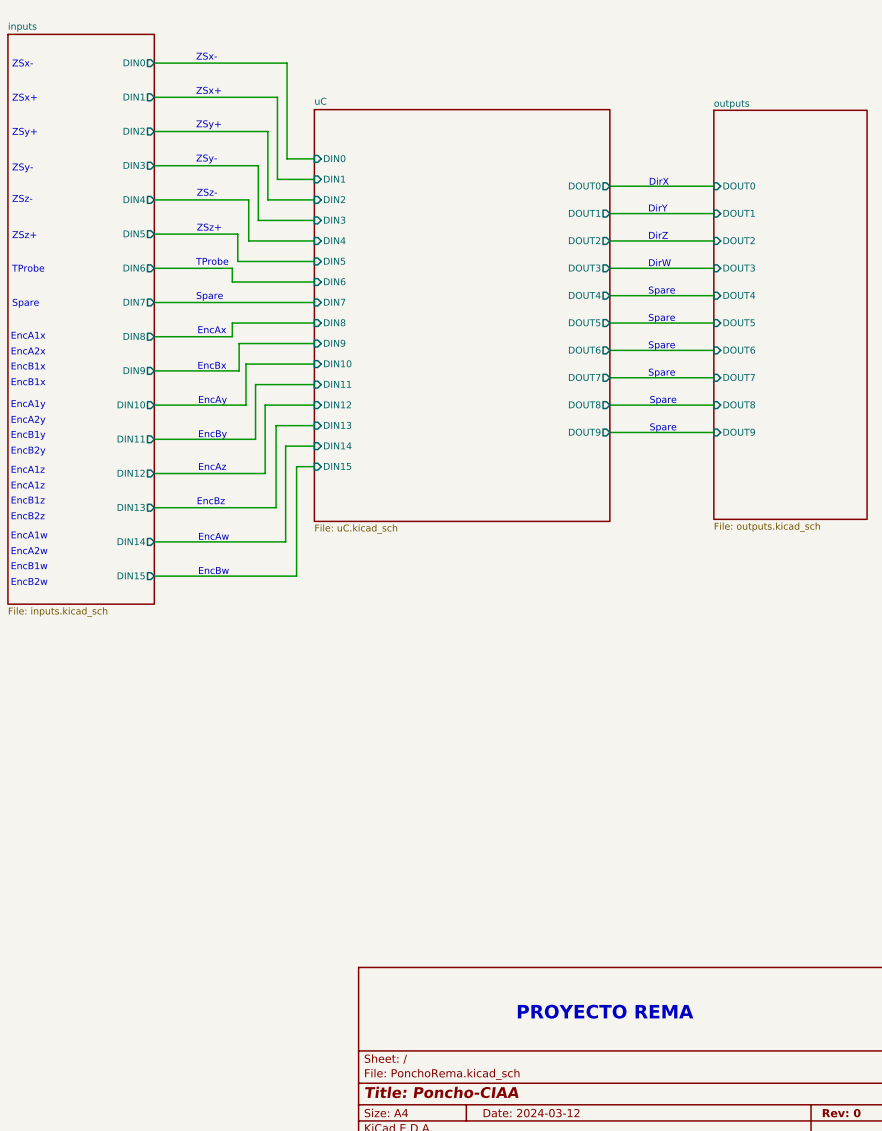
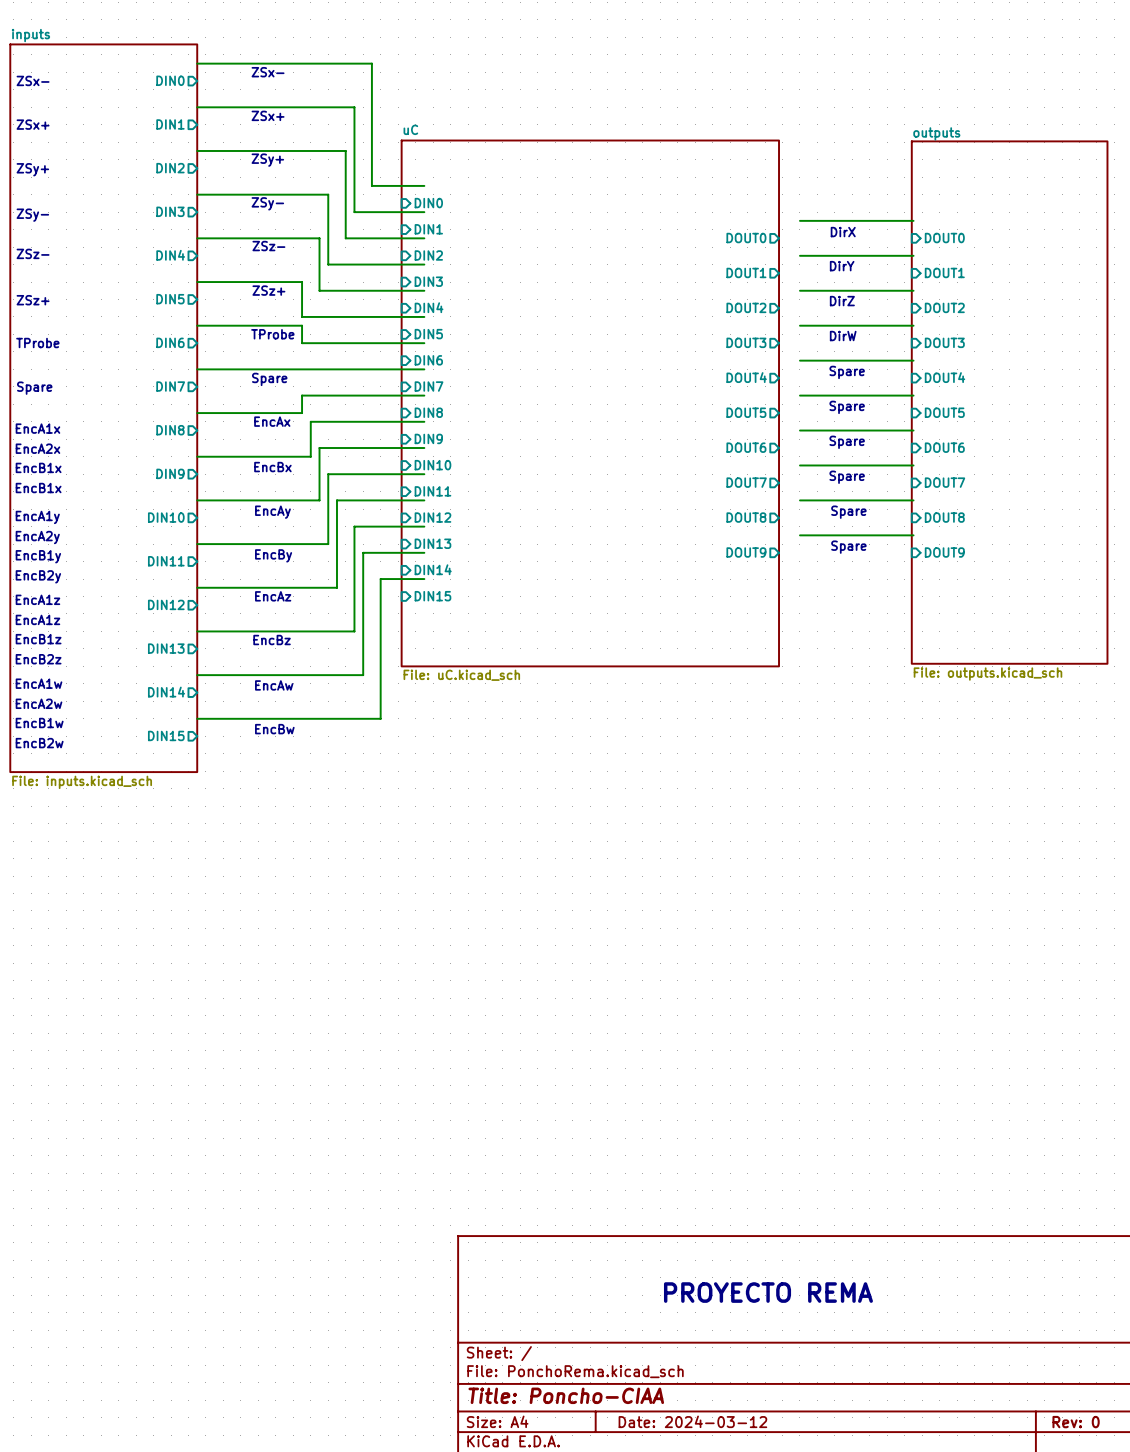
wire: none -> (197, 63) (371, 63) (371, 185) (424, 185)
wire: (154, 63) (287, 63) (287, 158) (314, 158) -> none
wire: (154, 97) (277, 97) -> (197, 107) (354, 107) (354, 124)
wire: none -> (197, 150) (345, 150) (345, 238) (424, 238)
wire: (154, 131) (267, 131) (267, 199) (314, 199) -> none
wire: none -> (197, 194) (328, 194) (328, 264) (424, 264)
wire: (154, 165) (258, 165) (258, 220) (314, 220) -> none
wire: (277, 165) (277, 179) (314, 179) -> (354, 212) (424, 212)
wire: none -> (799, 220) (913, 220)
wire: none -> (197, 238) (319, 238) (319, 290) (424, 290)
wire: (609, 186) (713, 186) -> none
wire: (154, 199) (248, 199) (248, 240) (314, 240) -> none
wire: none -> (799, 255) (913, 255)
wire: (609, 213) (713, 213) -> none
wire: none -> (197, 282) (302, 282) (302, 316) (424, 316)
wire: none -> (799, 290) (913, 290)
wire: (154, 234) (237, 234) (237, 261) (314, 261) -> none
wire: (609, 240) (713, 240) -> none
wire: none -> (197, 325) (302, 325) (302, 343) (424, 343)
wire: none -> (799, 325) (913, 325)
wire: (154, 268) (232, 268) (232, 281) (314, 281) -> none
wire: (609, 268) (713, 268) -> none
wire: none -> (799, 360) (913, 360)
wire: none -> (197, 369) (424, 369)
wire: (609, 295) (713, 295) -> none
wire: (154, 302) (314, 302) -> none
wire: none -> (799, 395) (913, 395)
wire: (232, 323) (232, 336) (154, 336) -> (296, 413) (197, 413)
wire: (236, 323) (314, 323) -> (302, 413) (302, 395) (424, 395)
wire: (609, 323) (713, 323) -> none
wire: none -> (424, 421) (310, 421) (310, 456) (197, 456)
wire: none -> (799, 430) (913, 430)
wire: (314, 343) (239, 343) (239, 370) (154, 370) -> none
wire: none -> (424, 448) (319, 448) (319, 500) (197, 500)
wire: (609, 350) (713, 350) -> none
wire: (314, 364) (245, 364) (245, 405) (154, 405) -> none
wire: none -> (799, 465) (913, 465)
wire: none -> (424, 474) (328, 474) (328, 544) (197, 544)
wire: (609, 377) (713, 377) -> none
wire: (314, 384) (255, 384) (255, 439) (154, 439) -> none
wire: none -> (424, 500) (336, 500) (336, 587) (197, 587)
wire: none -> (799, 500) (913, 500)
wire: (314, 405) (265, 405) (265, 473) (154, 473) -> none
wire: (609, 405) (713, 405) -> none
wire: none -> (424, 526) (354, 526) (354, 631) (197, 631)
wire: none -> (799, 535) (913, 535)
wire: (314, 425) (276, 425) (276, 507) (154, 507) -> none
wire: none -> (424, 552) (363, 552) (363, 675) (197, 675)
wire: (609, 432) (713, 432) -> none
wire: (314, 446) (285, 446) (285, 541) (154, 541) -> none
wire: none -> (424, 579) (380, 579) (380, 718) (197, 718)
wire: (314, 466) (296, 466) (296, 576) (154, 576) -> none

